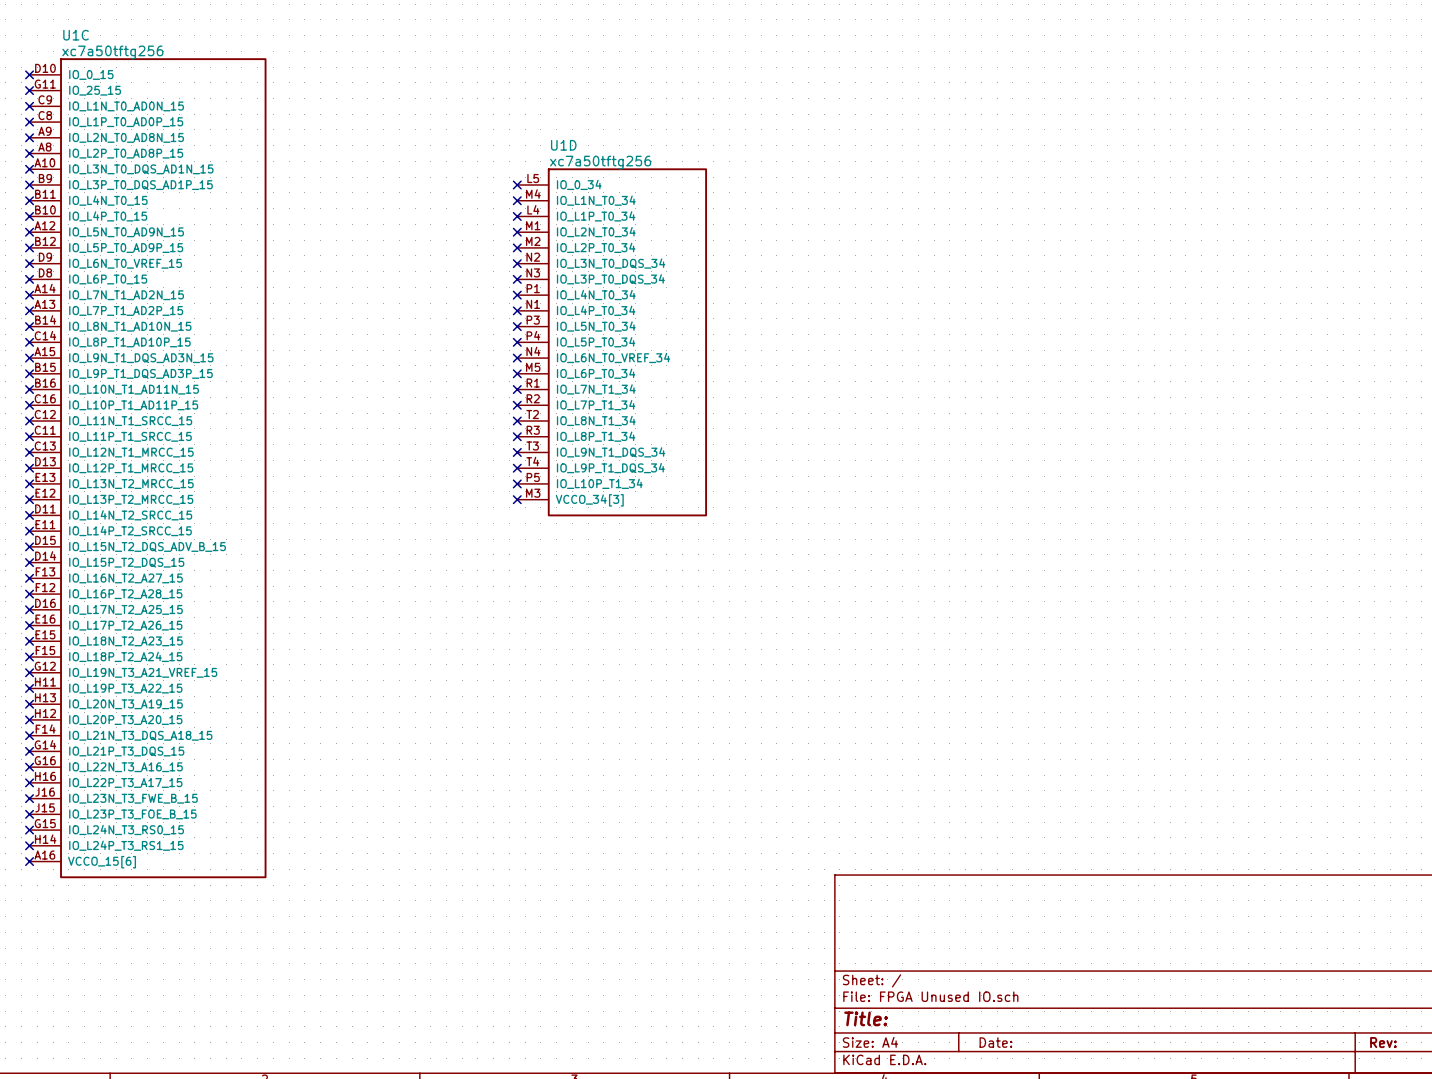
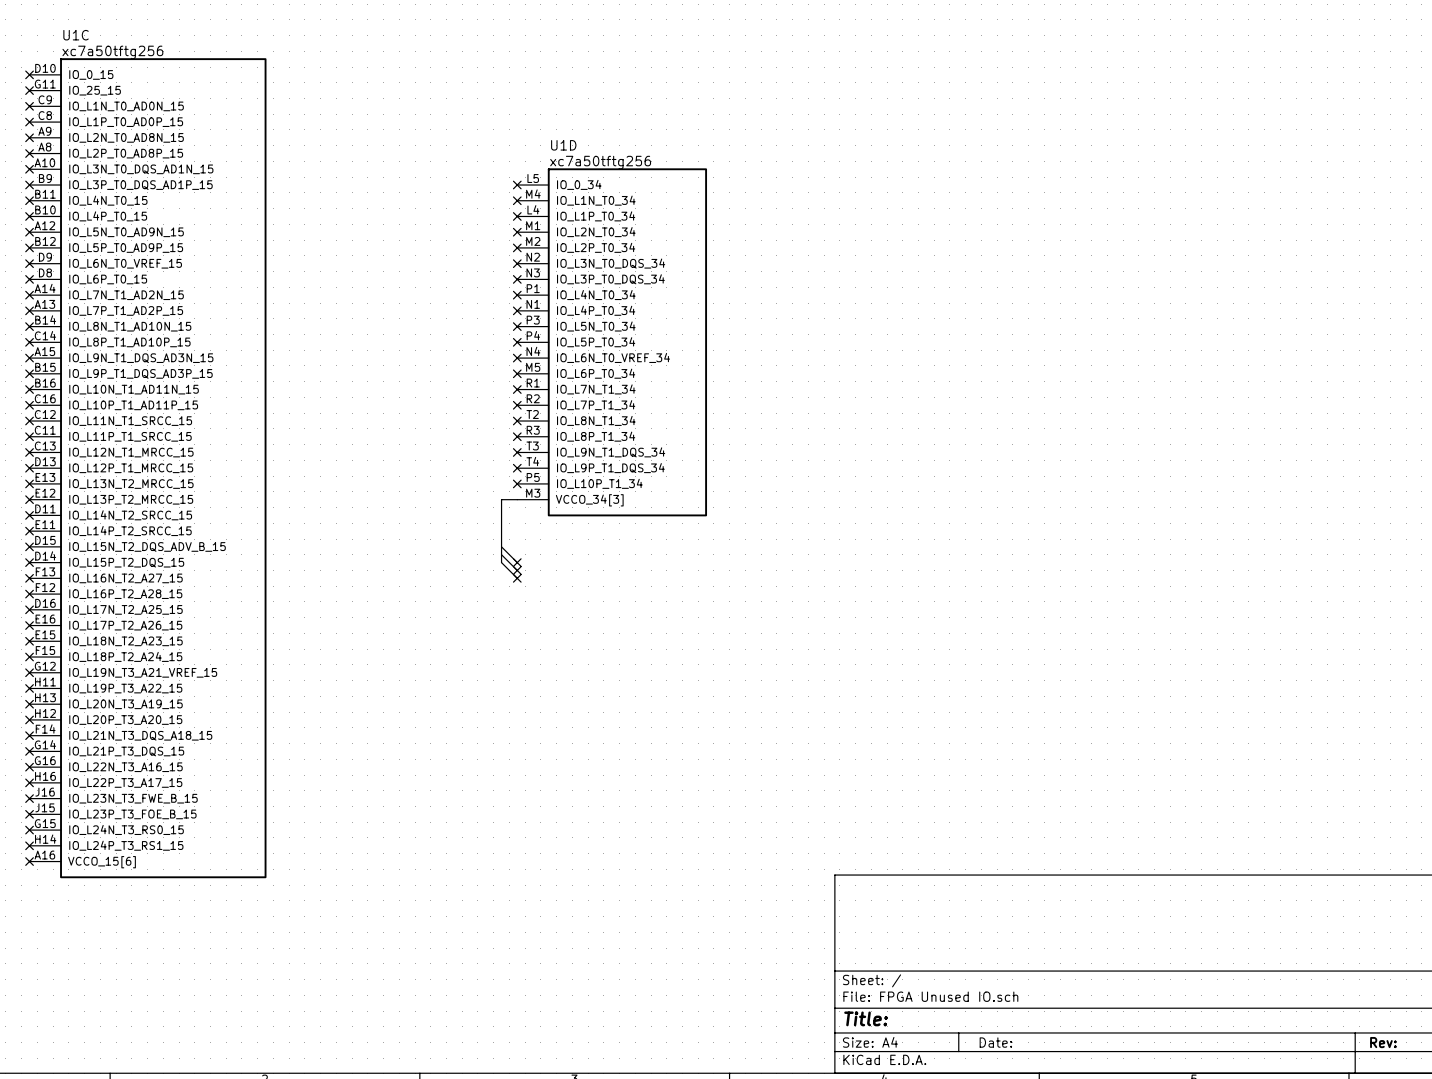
bus: none -> (517, 499) (501, 499) (501, 562)
no-connect mark: (517, 499) -> none
wire: none -> (501, 546) (517, 562)
wire: none -> (501, 554) (517, 570)
wire: none -> (501, 562) (517, 578)
no-connect mark: none -> (517, 562)
no-connect mark: none -> (517, 570)
no-connect mark: none -> (517, 578)

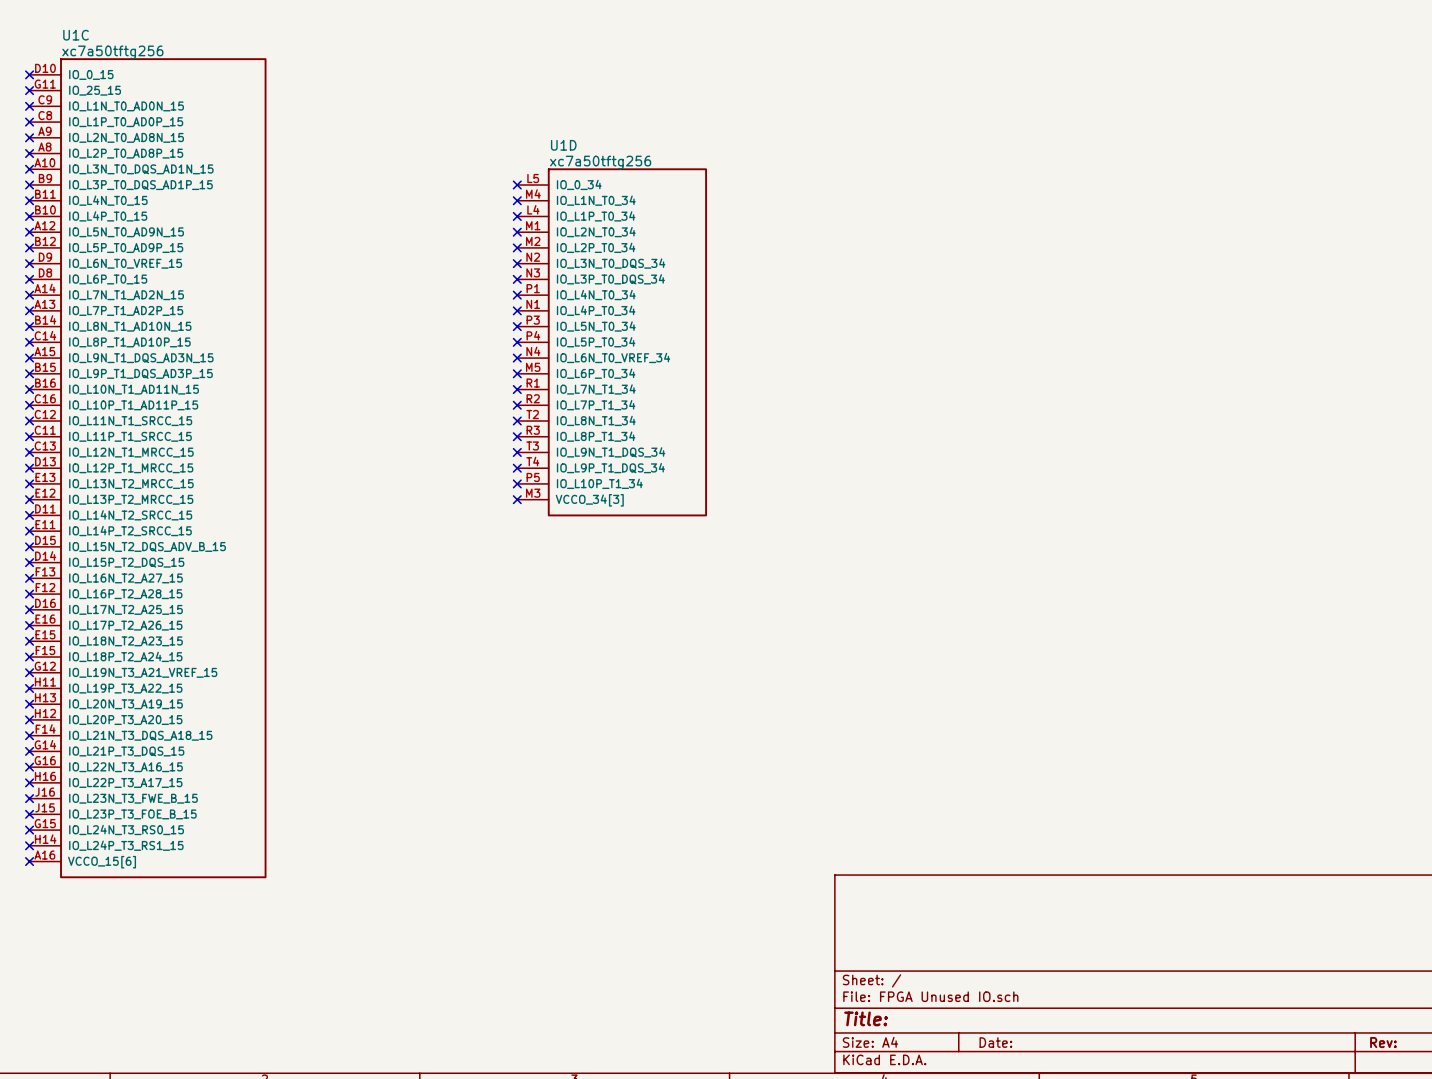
bus: (517, 499) (501, 499) (501, 562) -> none
no-connect mark: none -> (517, 499)
wire: (501, 546) (517, 562) -> none
wire: (501, 554) (517, 570) -> none
wire: (501, 562) (517, 578) -> none
no-connect mark: (517, 562) -> none
no-connect mark: (517, 570) -> none
no-connect mark: (517, 578) -> none

